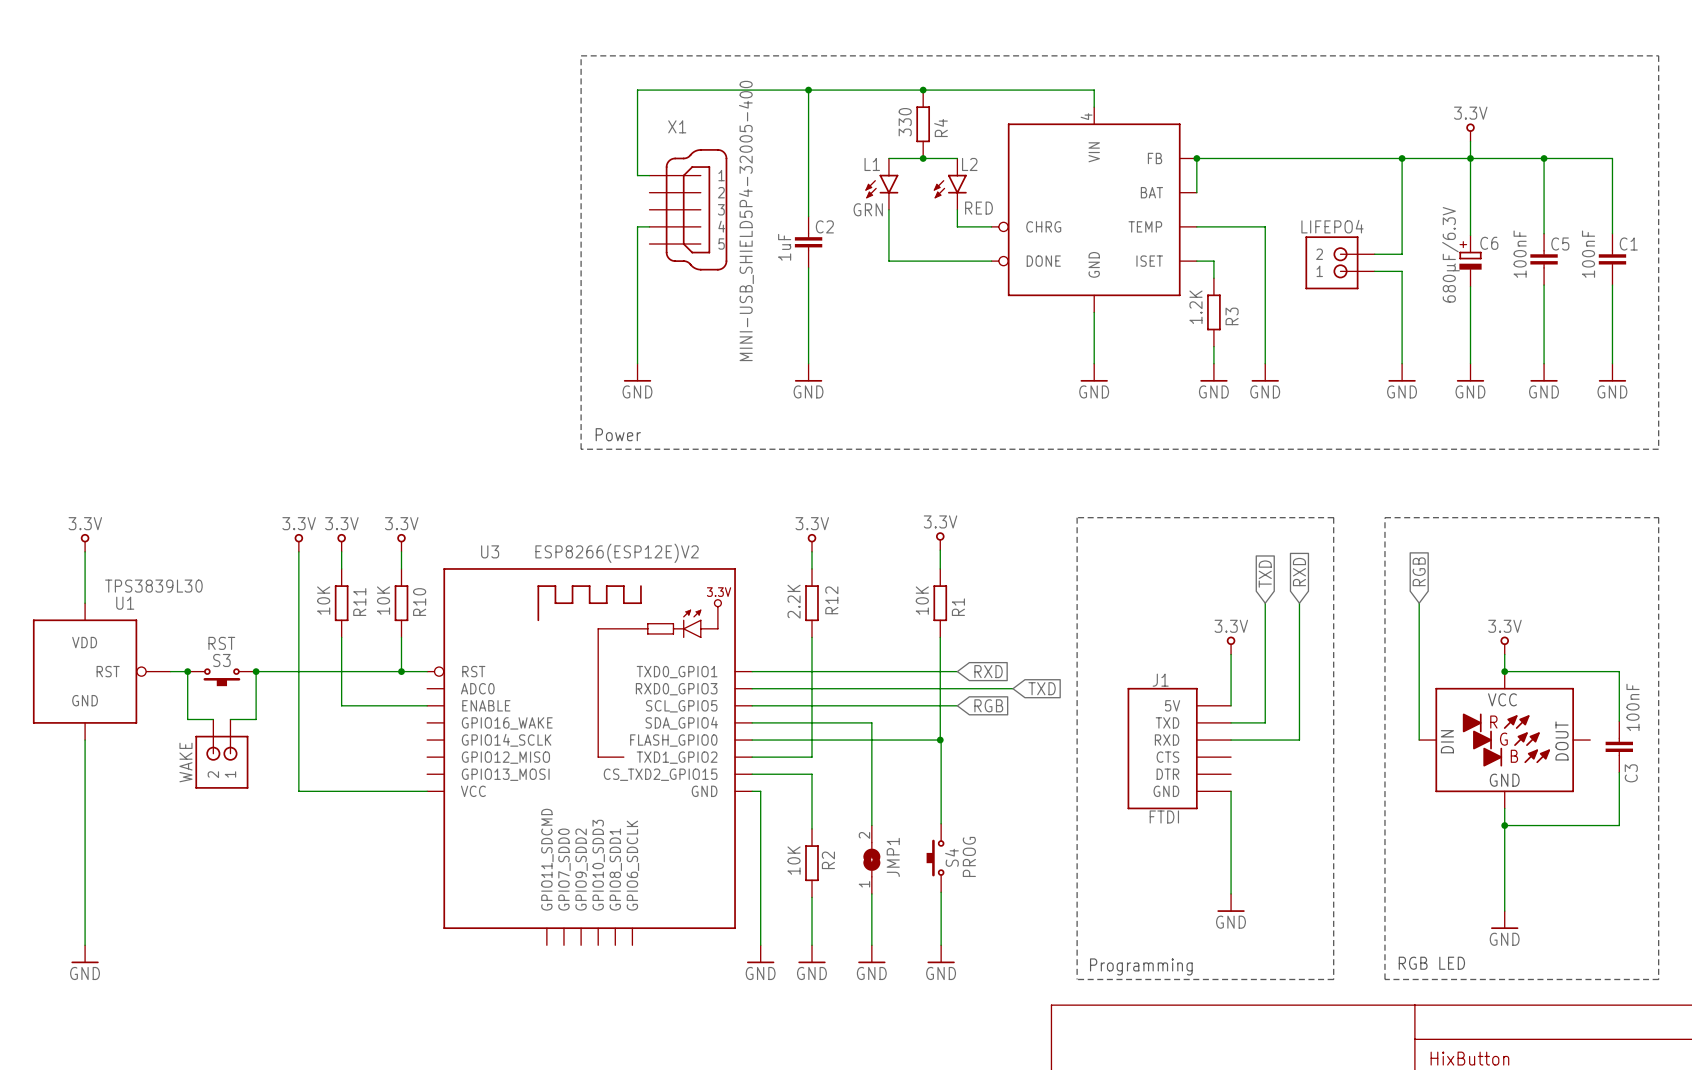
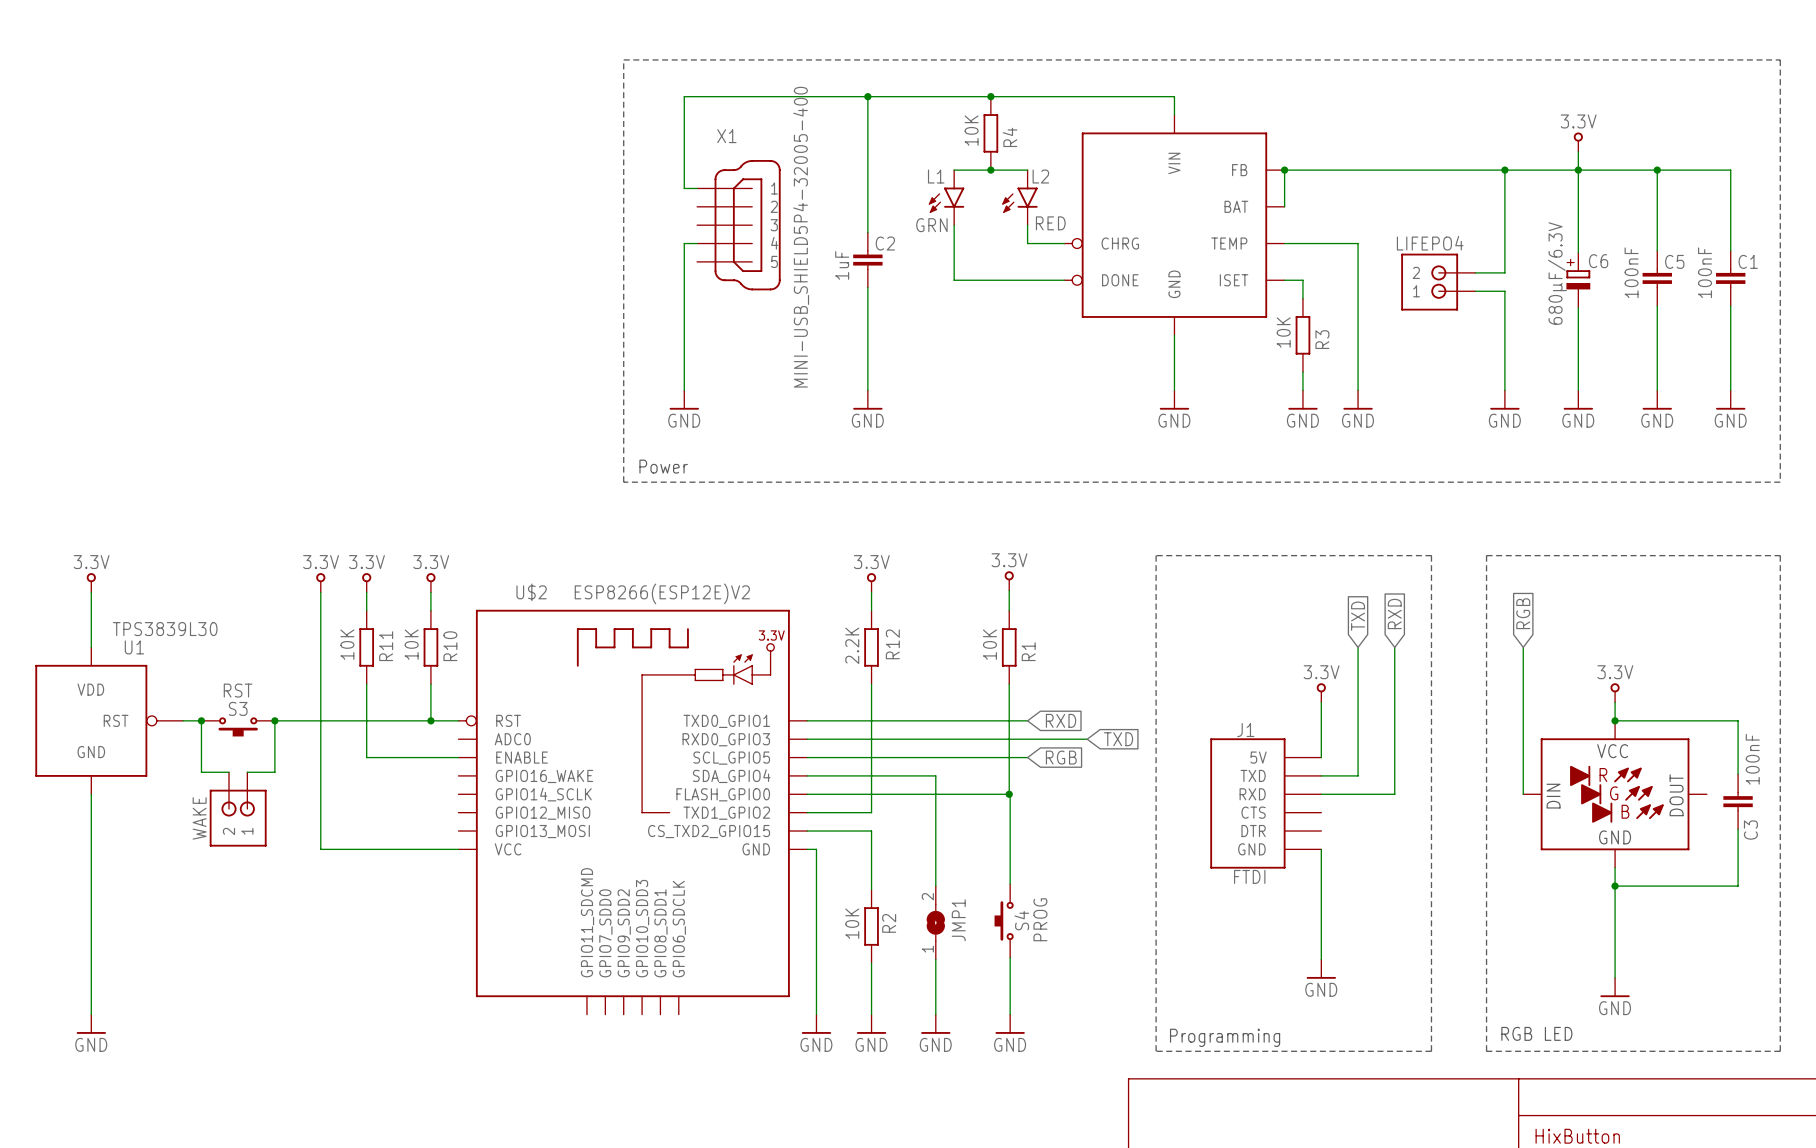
R4 value: 330 (905, 122) -> 10K (971, 130)
part: (1094, 209) -> none
R3 value: 1.2K (1195, 307) -> 10K (1283, 332)
U3 name: U3 (490, 551) -> U$2 (531, 592)

